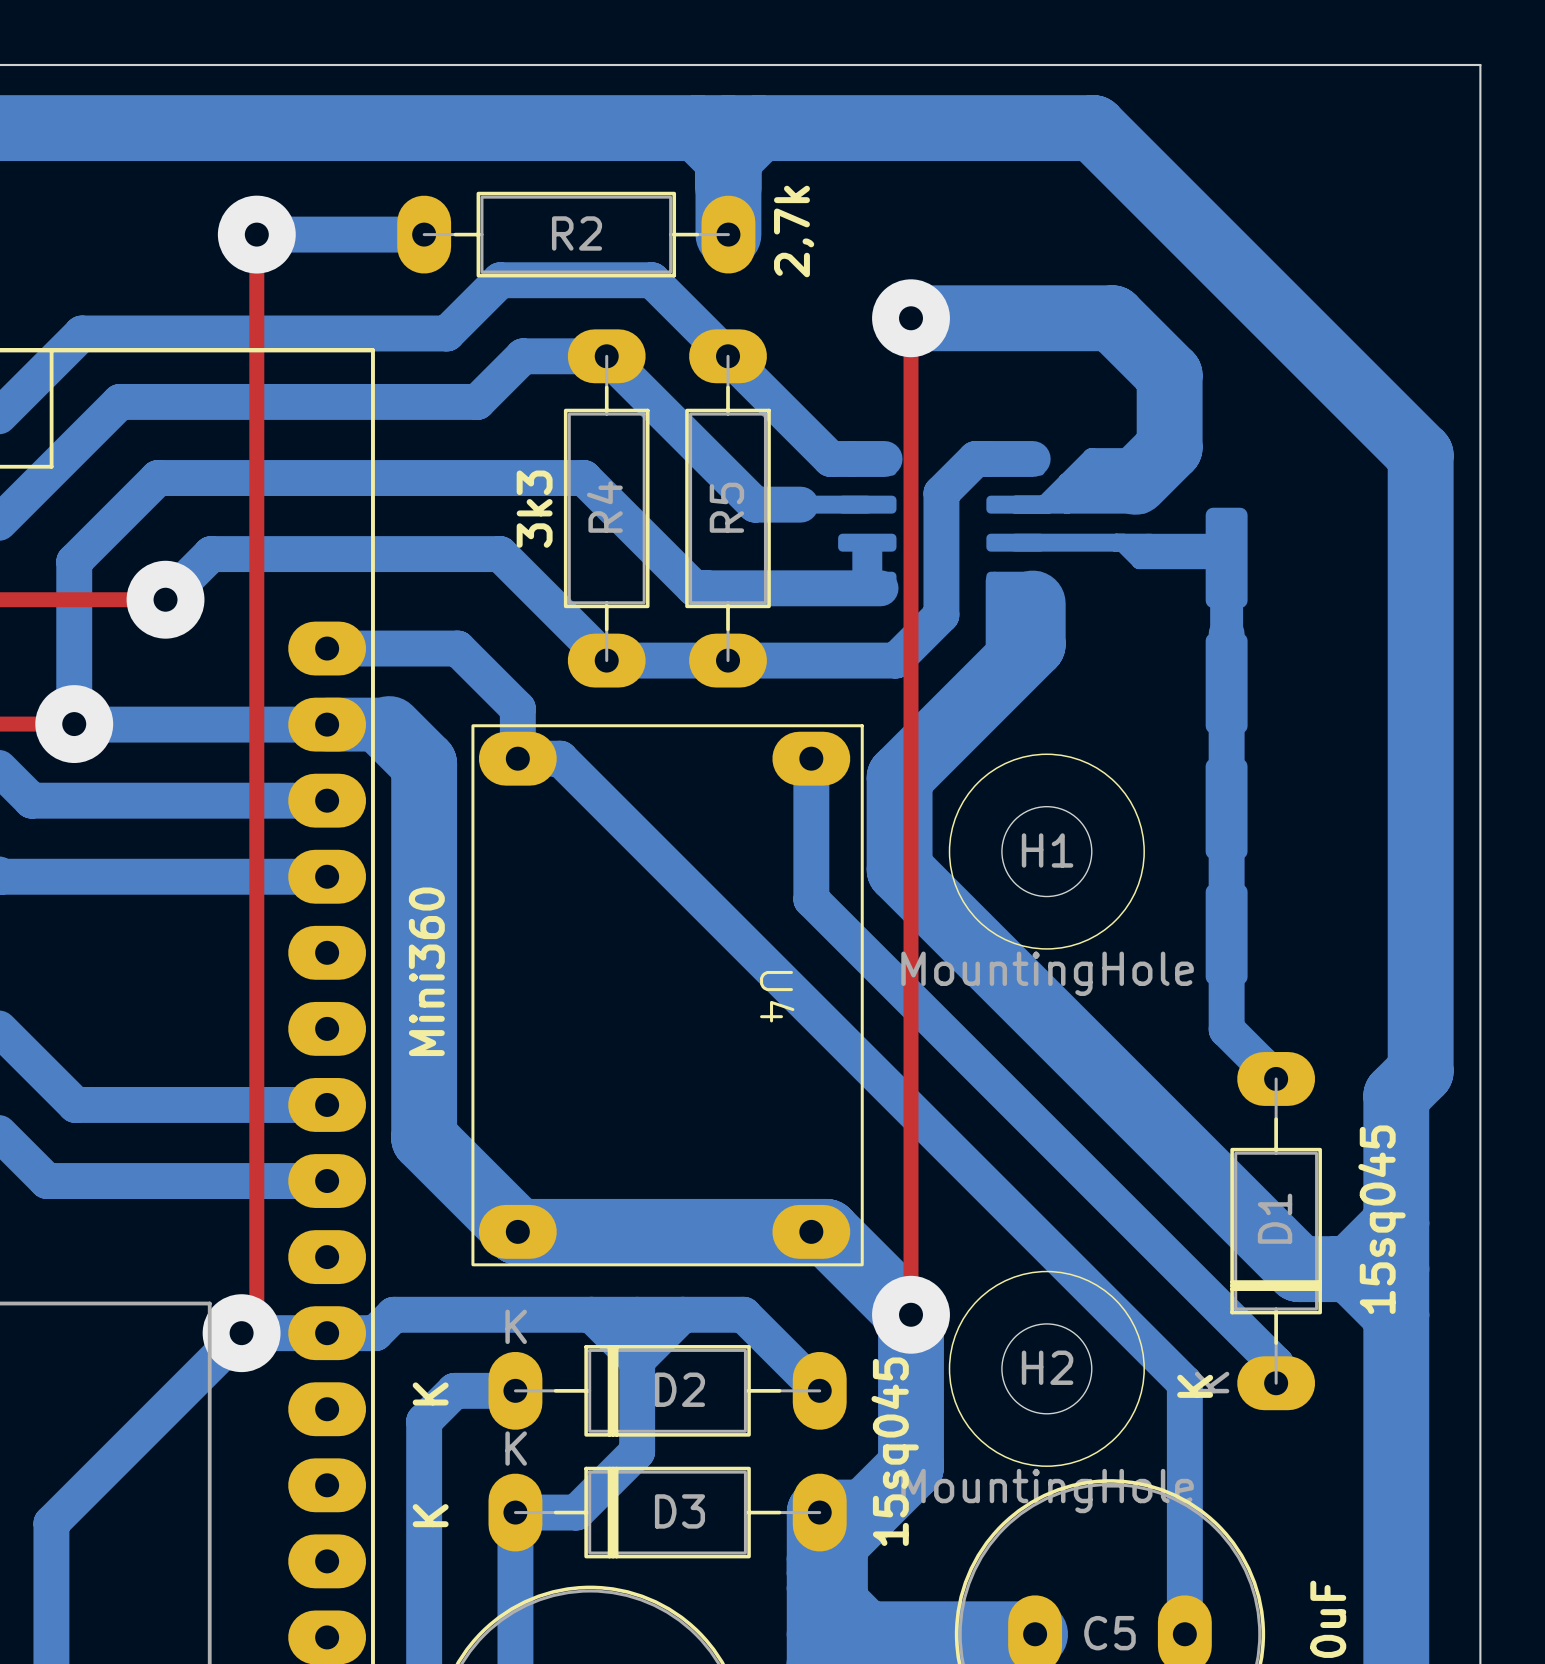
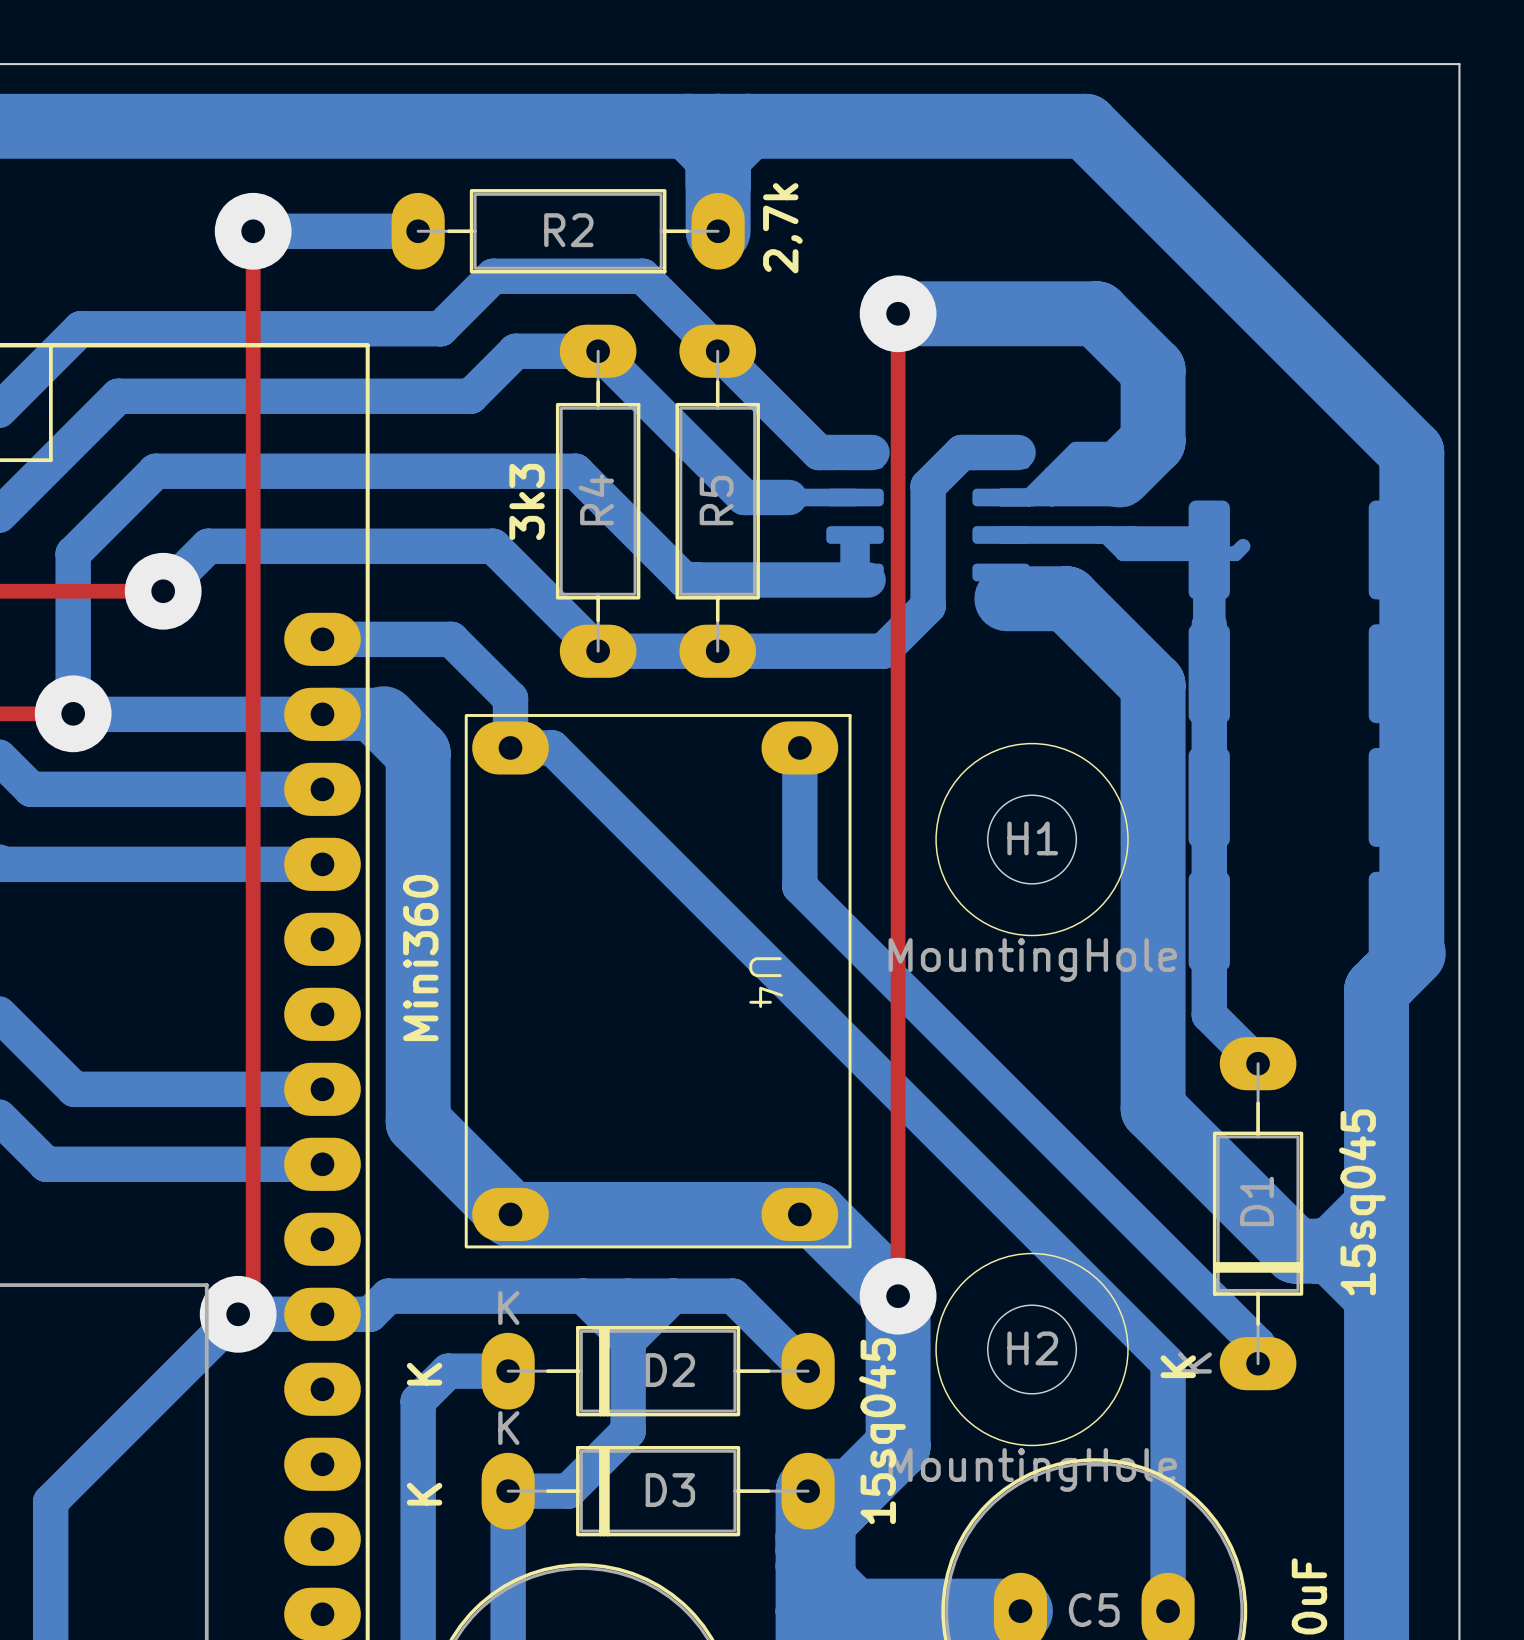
bottom track: (1093, 128) (1420, 455) (1420, 1071) (1396, 1095) -> (1078, 126) (1085, 126) (1411, 452) (1411, 943)
bottom track: none -> (1243, 546) (1235, 553) (1205, 553)
bottom track: (994, 580) (994, 679) -> none
bottom track: (1032, 603) (1032, 644) (899, 777) (899, 869) (1298, 1269) (1314, 1269) -> (1074, 572) (1048, 598) (1006, 598) (1066, 598) (1153, 684) (1153, 1108) (1295, 1251)
bottom track: none -> (1413, 953) (1376, 990) (1376, 1080)

